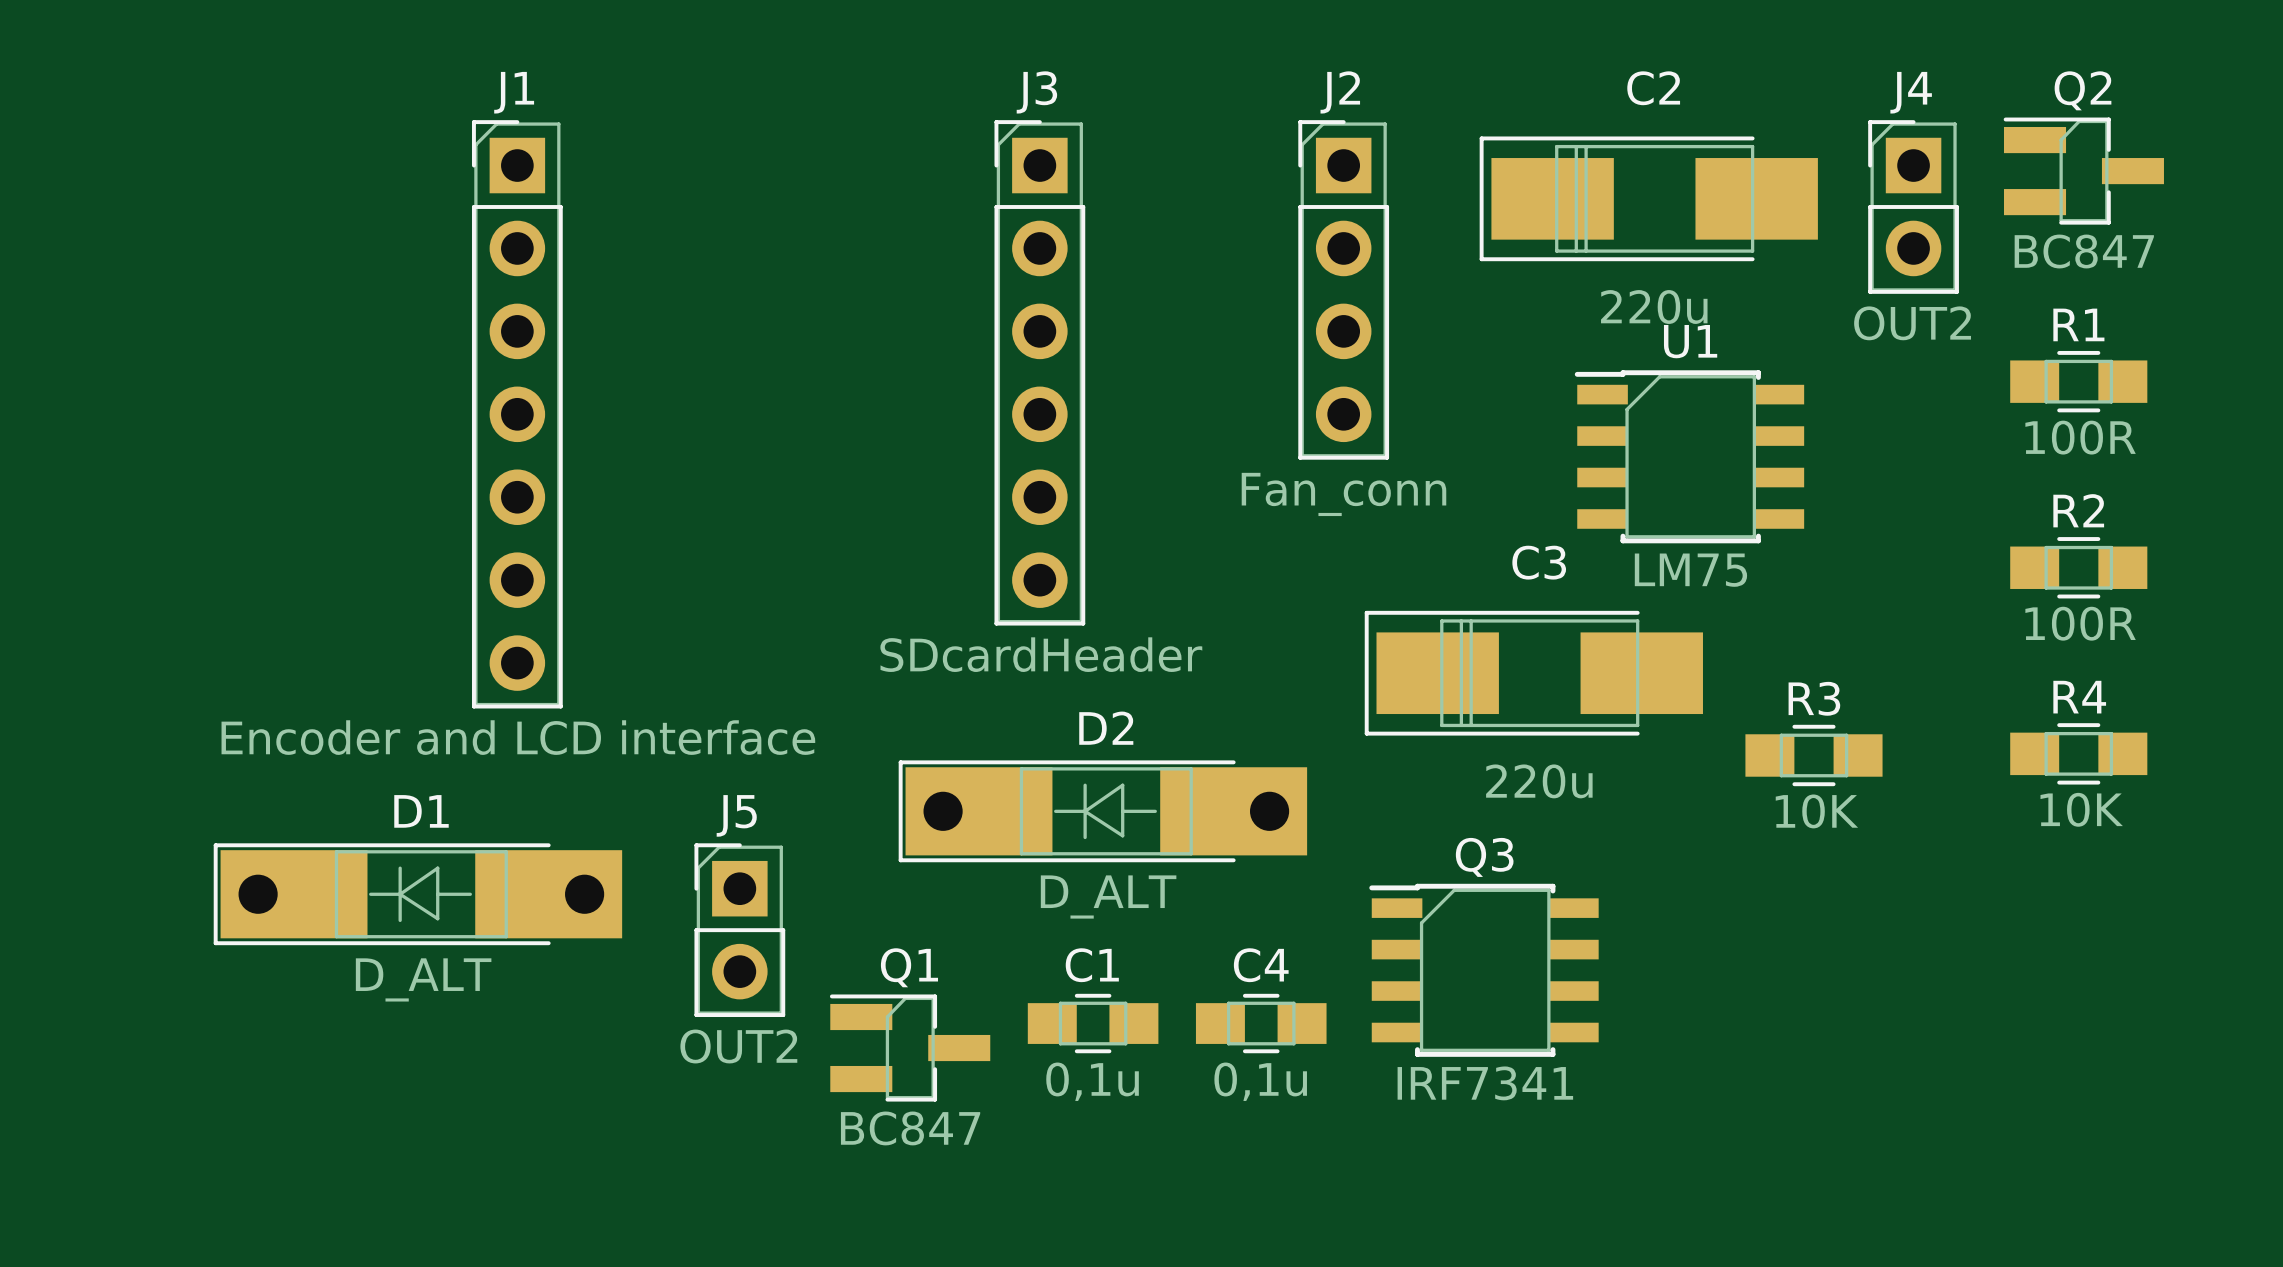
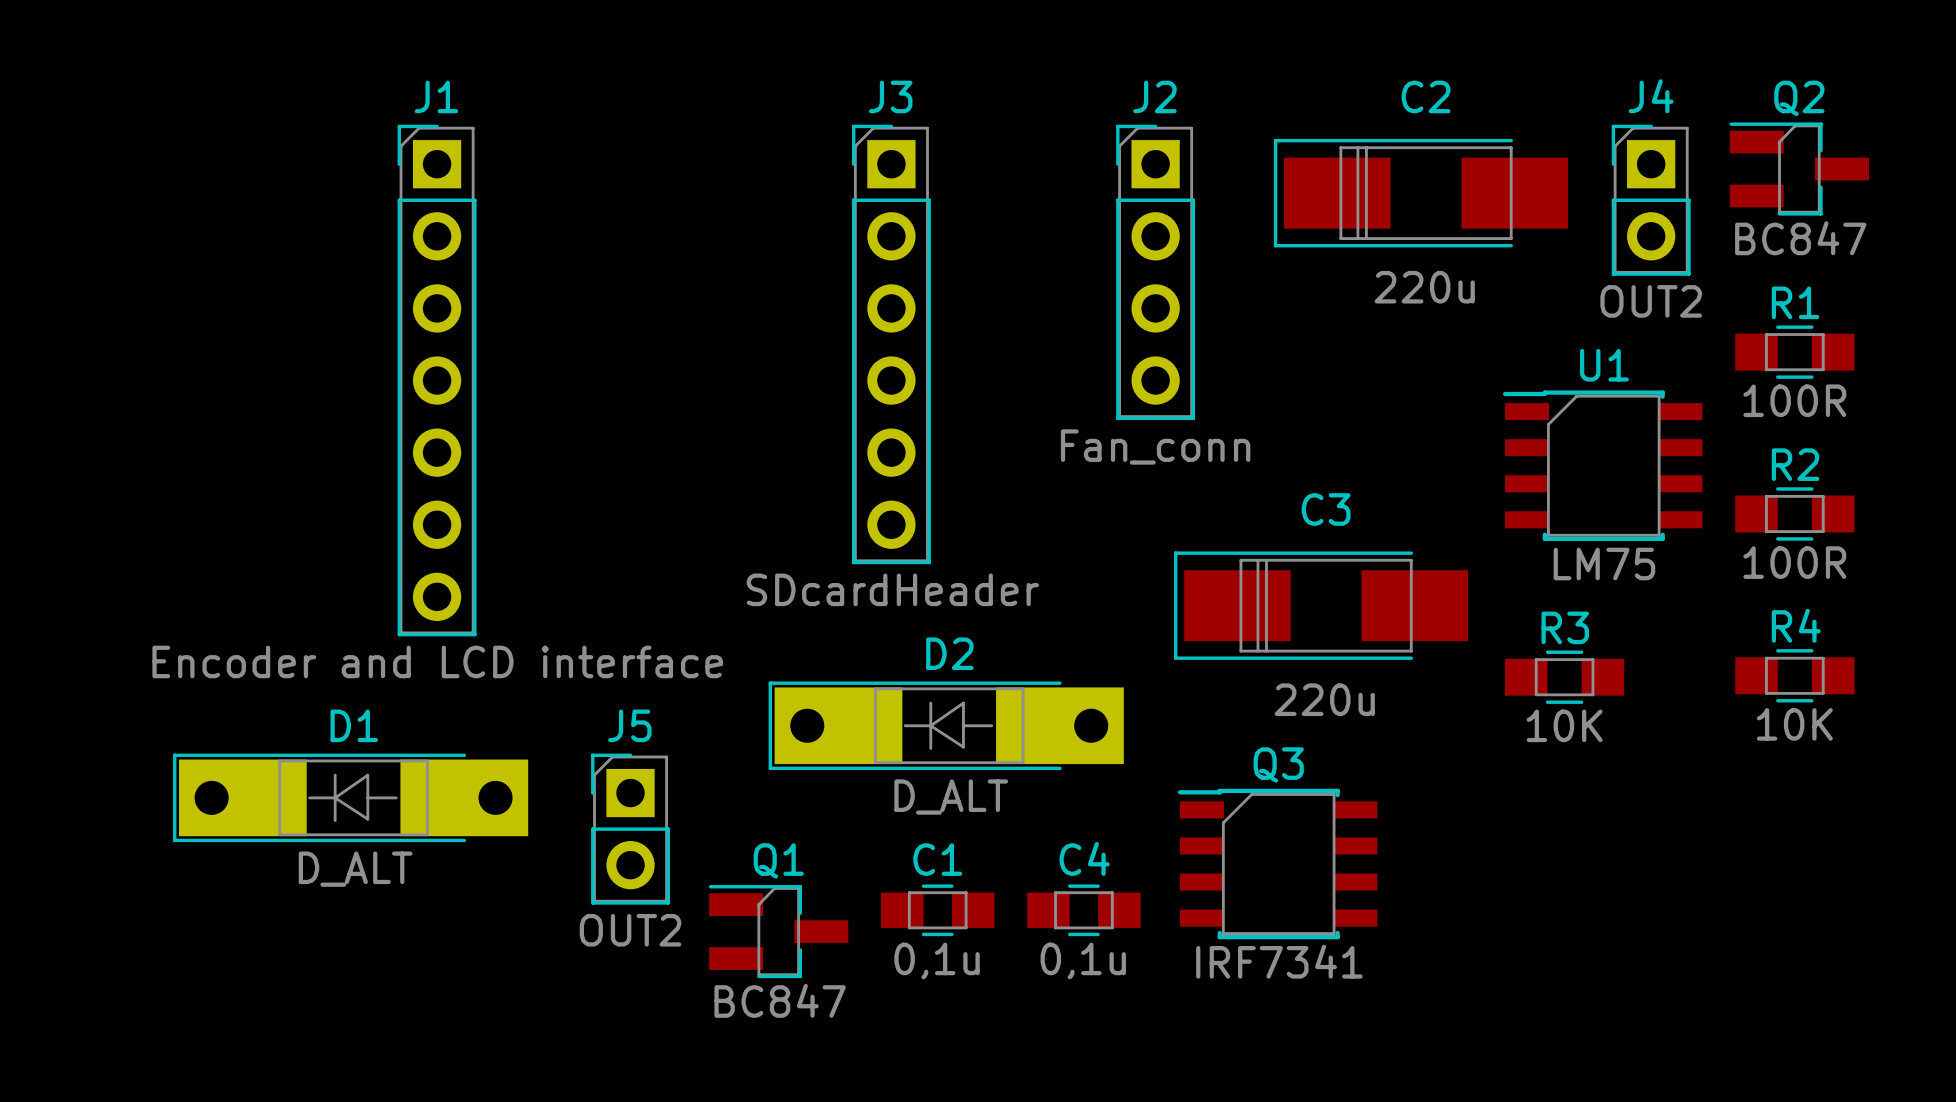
U1 position: (1689, 456) -> (1602, 465)

